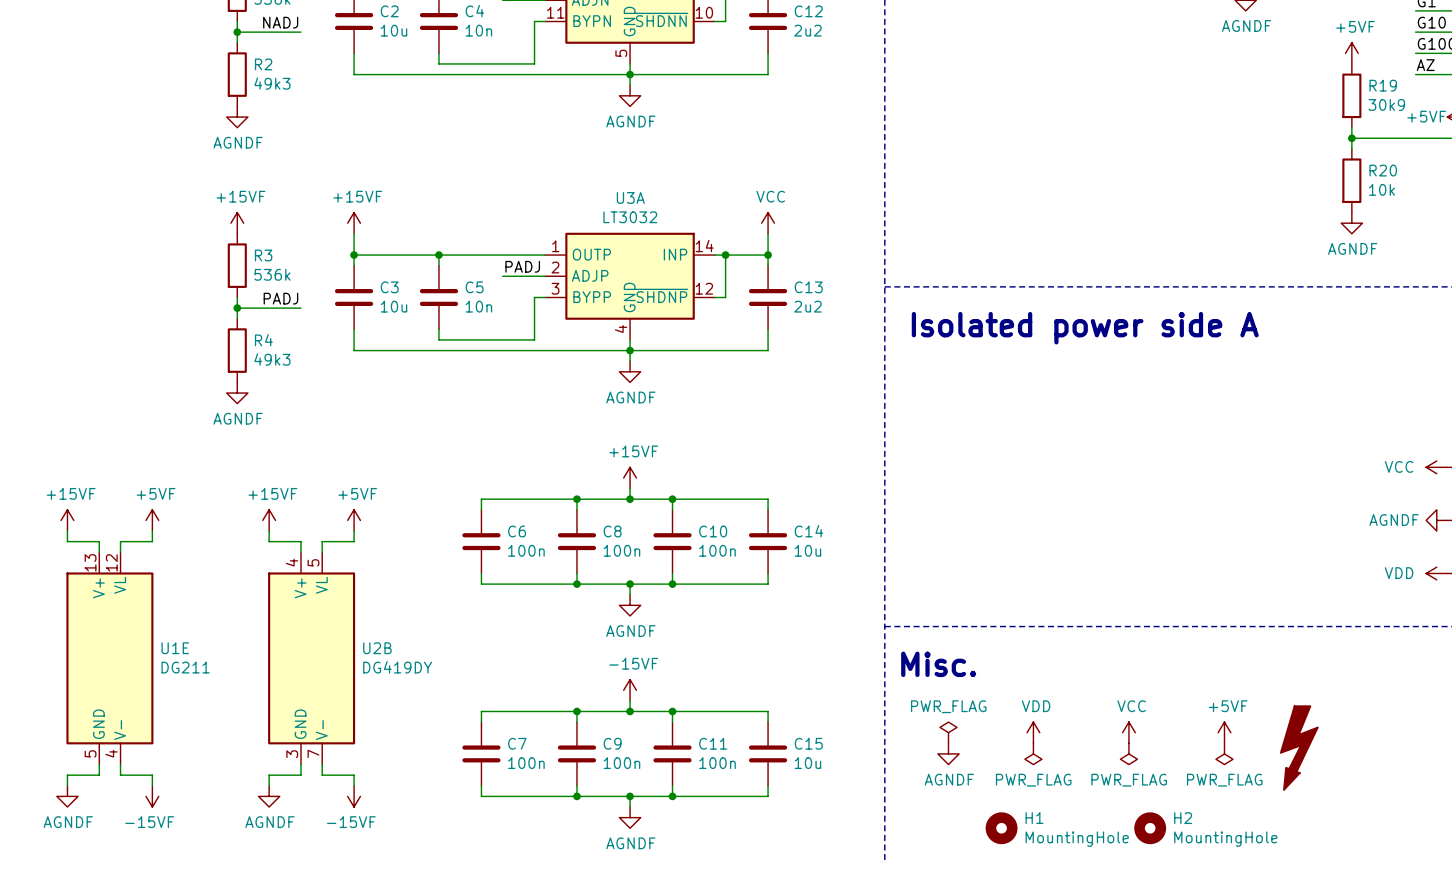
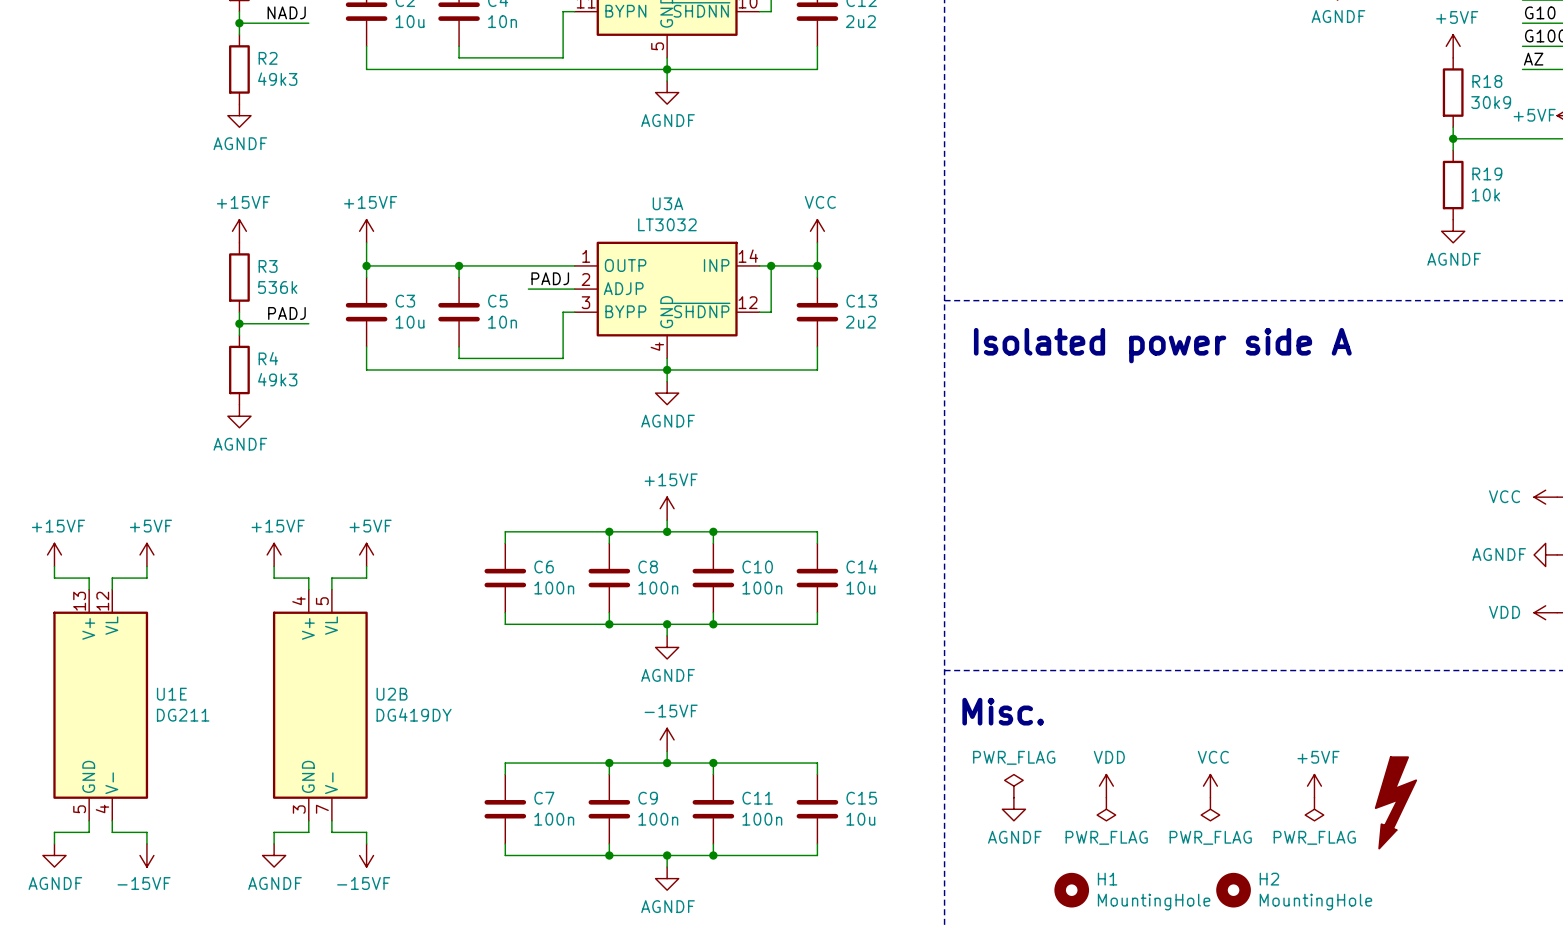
R19 name: R19 (1383, 85) -> R18 (1487, 81)
R20 name: R20 (1383, 170) -> R19 (1487, 173)

